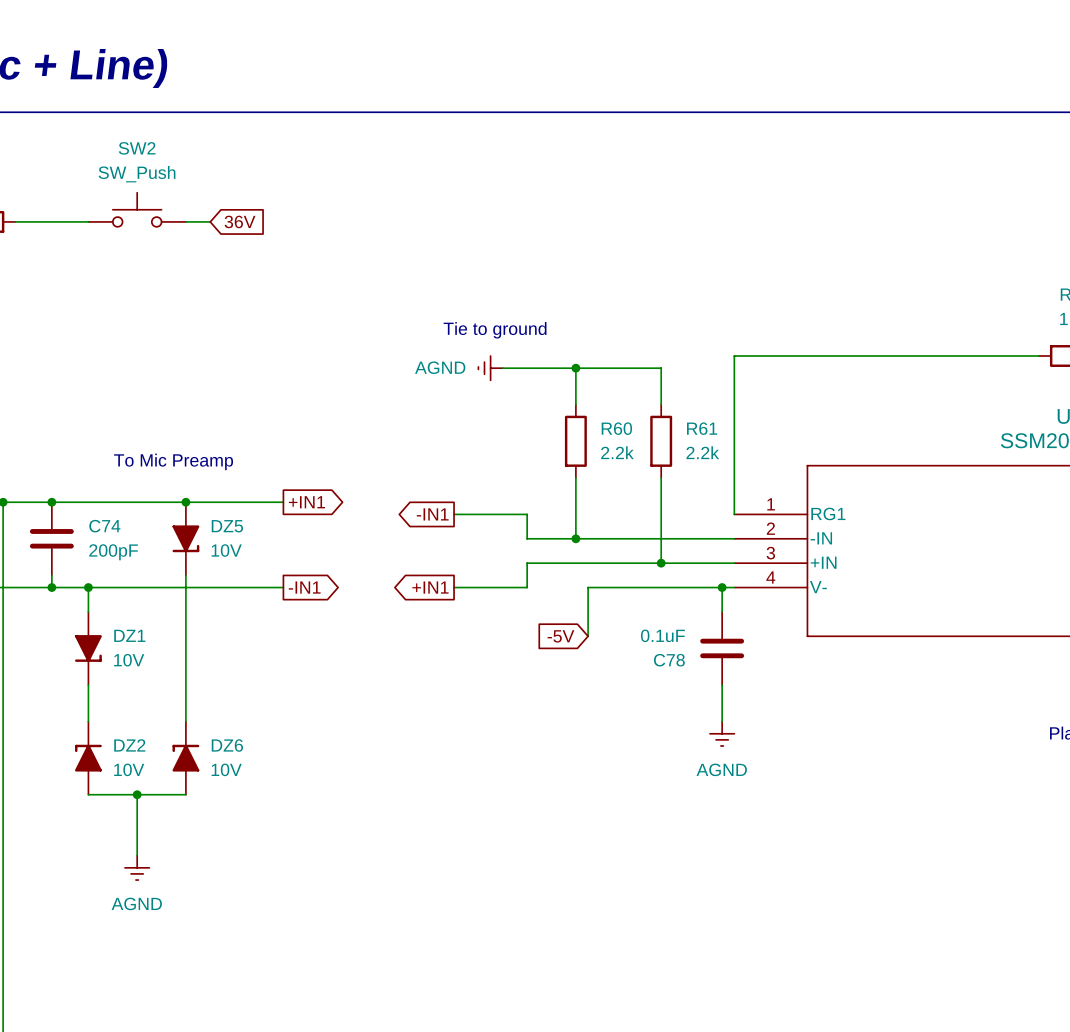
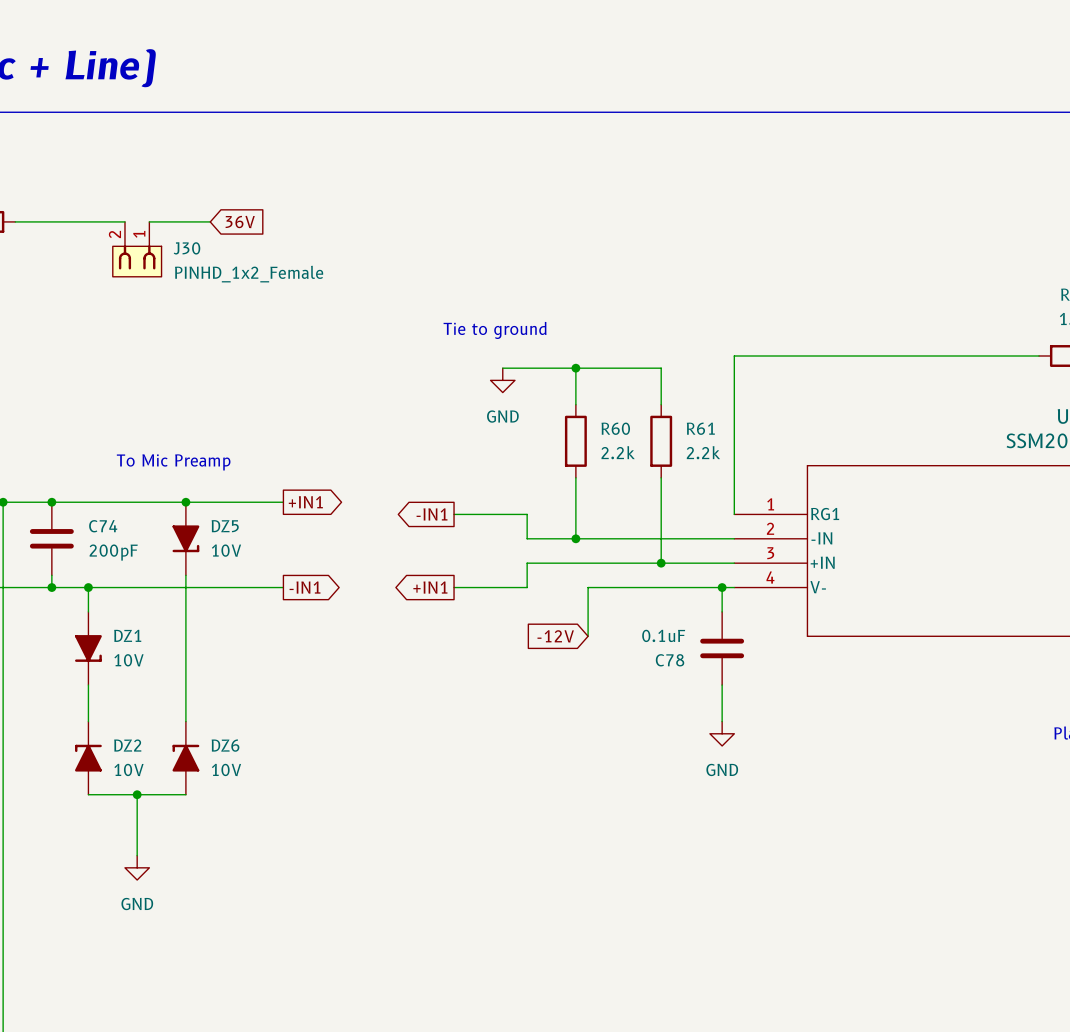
SW2: SW_Push (137, 209) -> none
J30: none -> PINHD_1x2_Female (137, 249)
power symbol: AGND (490, 368) -> none
power symbol: none -> GND (502, 380)
global label: -5V (560, 636) -> -12V (555, 636)
power symbol: AGND (722, 733) -> GND (722, 733)
power symbol: AGND (137, 867) -> GND (137, 867)

